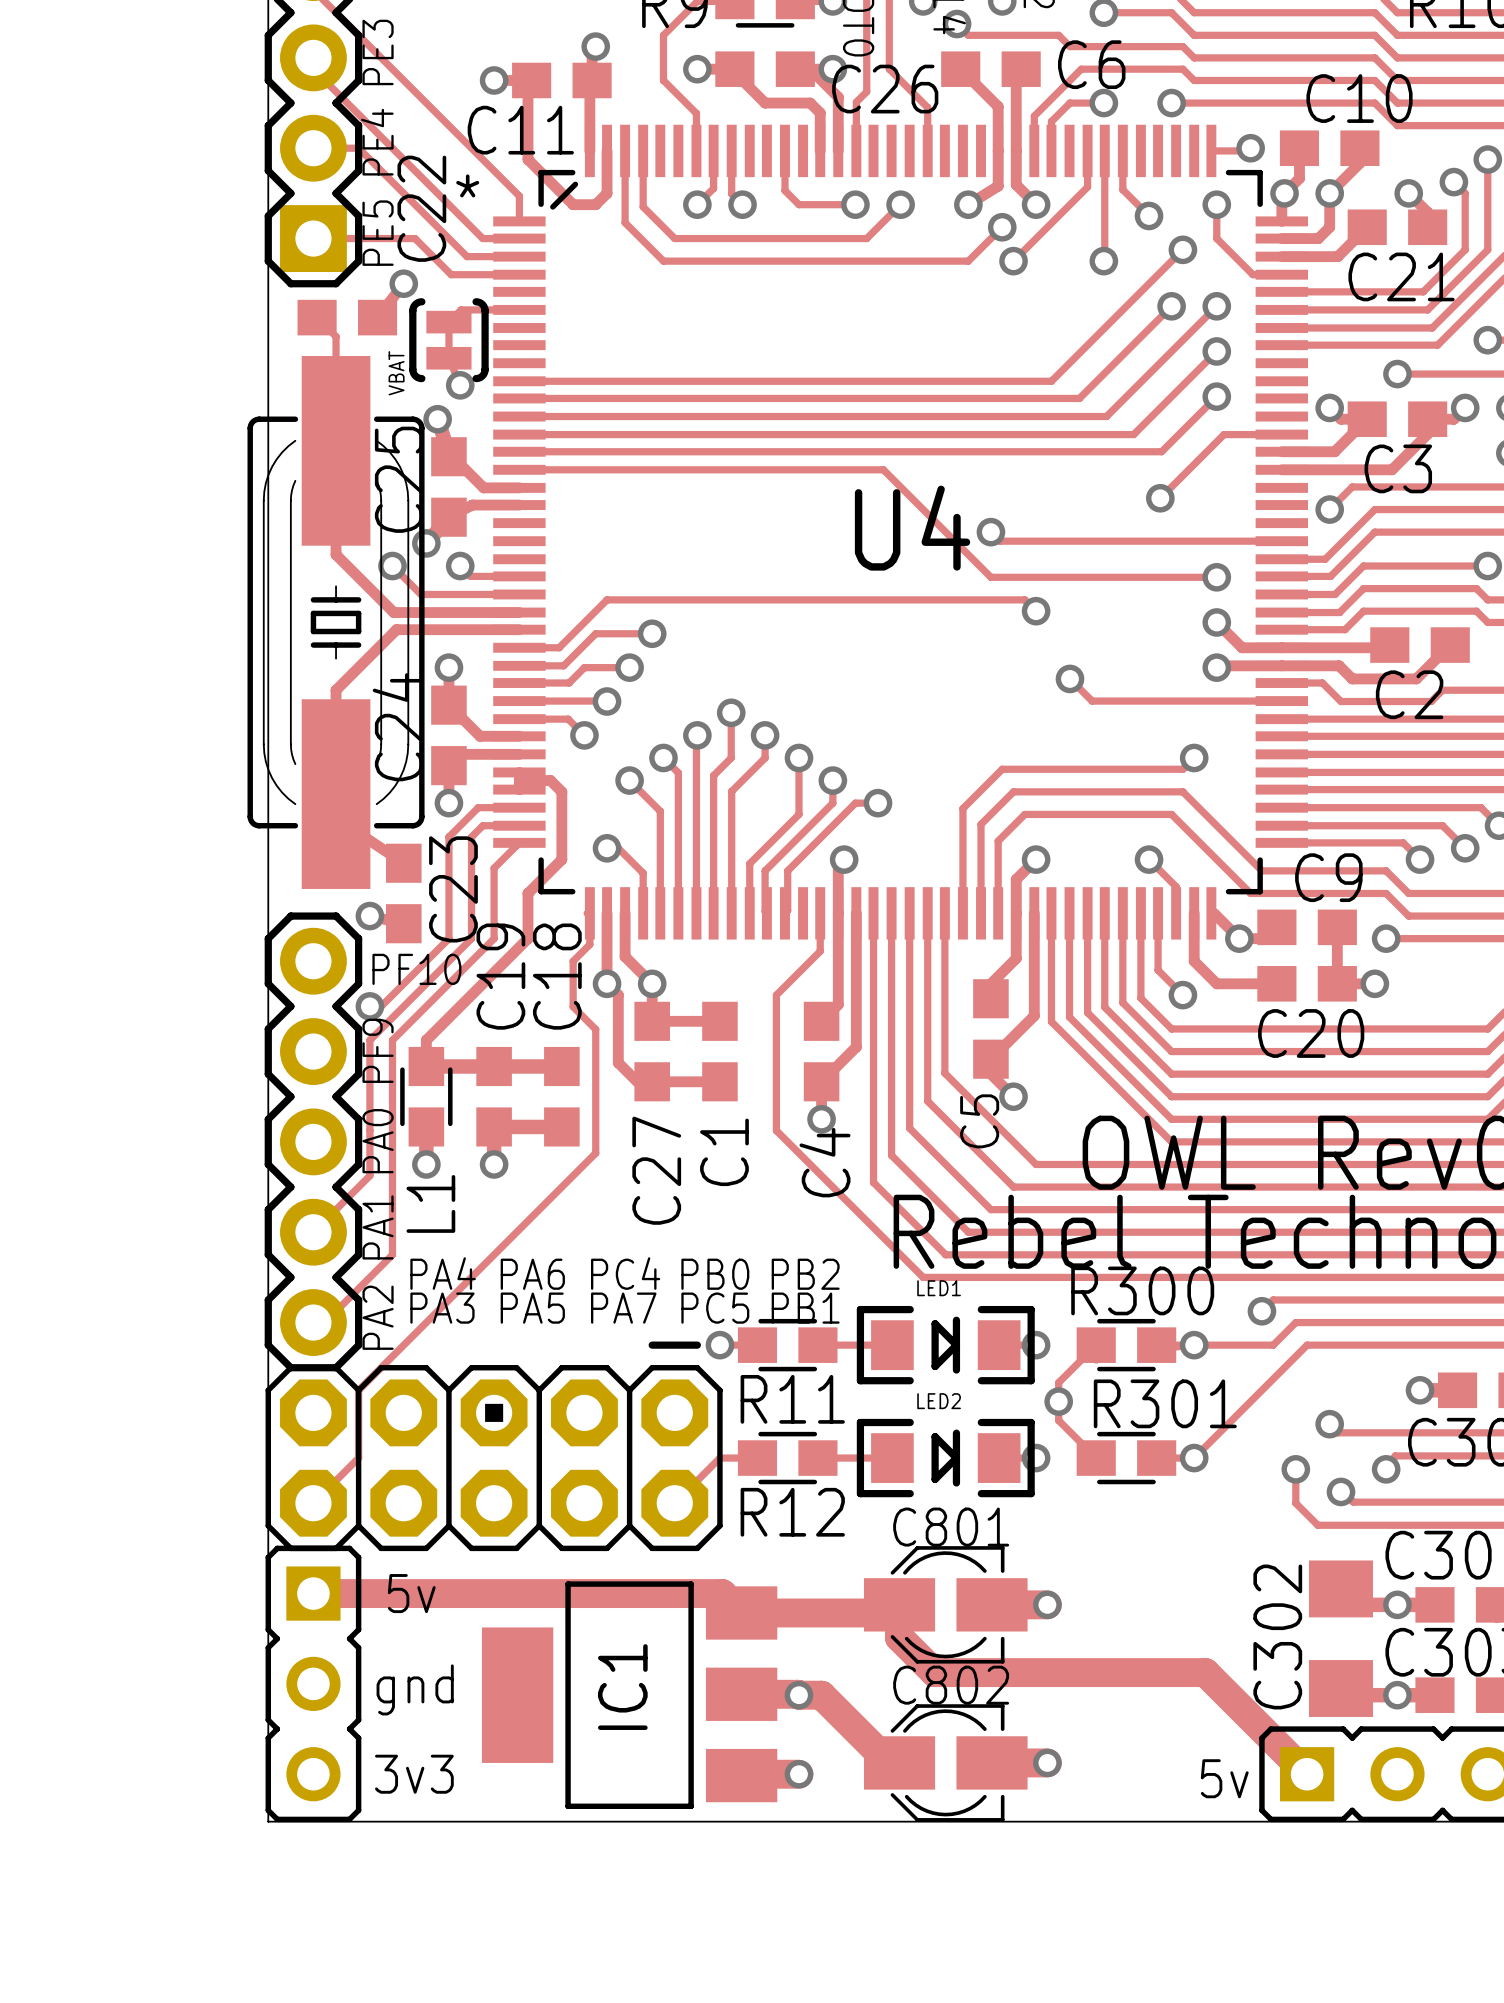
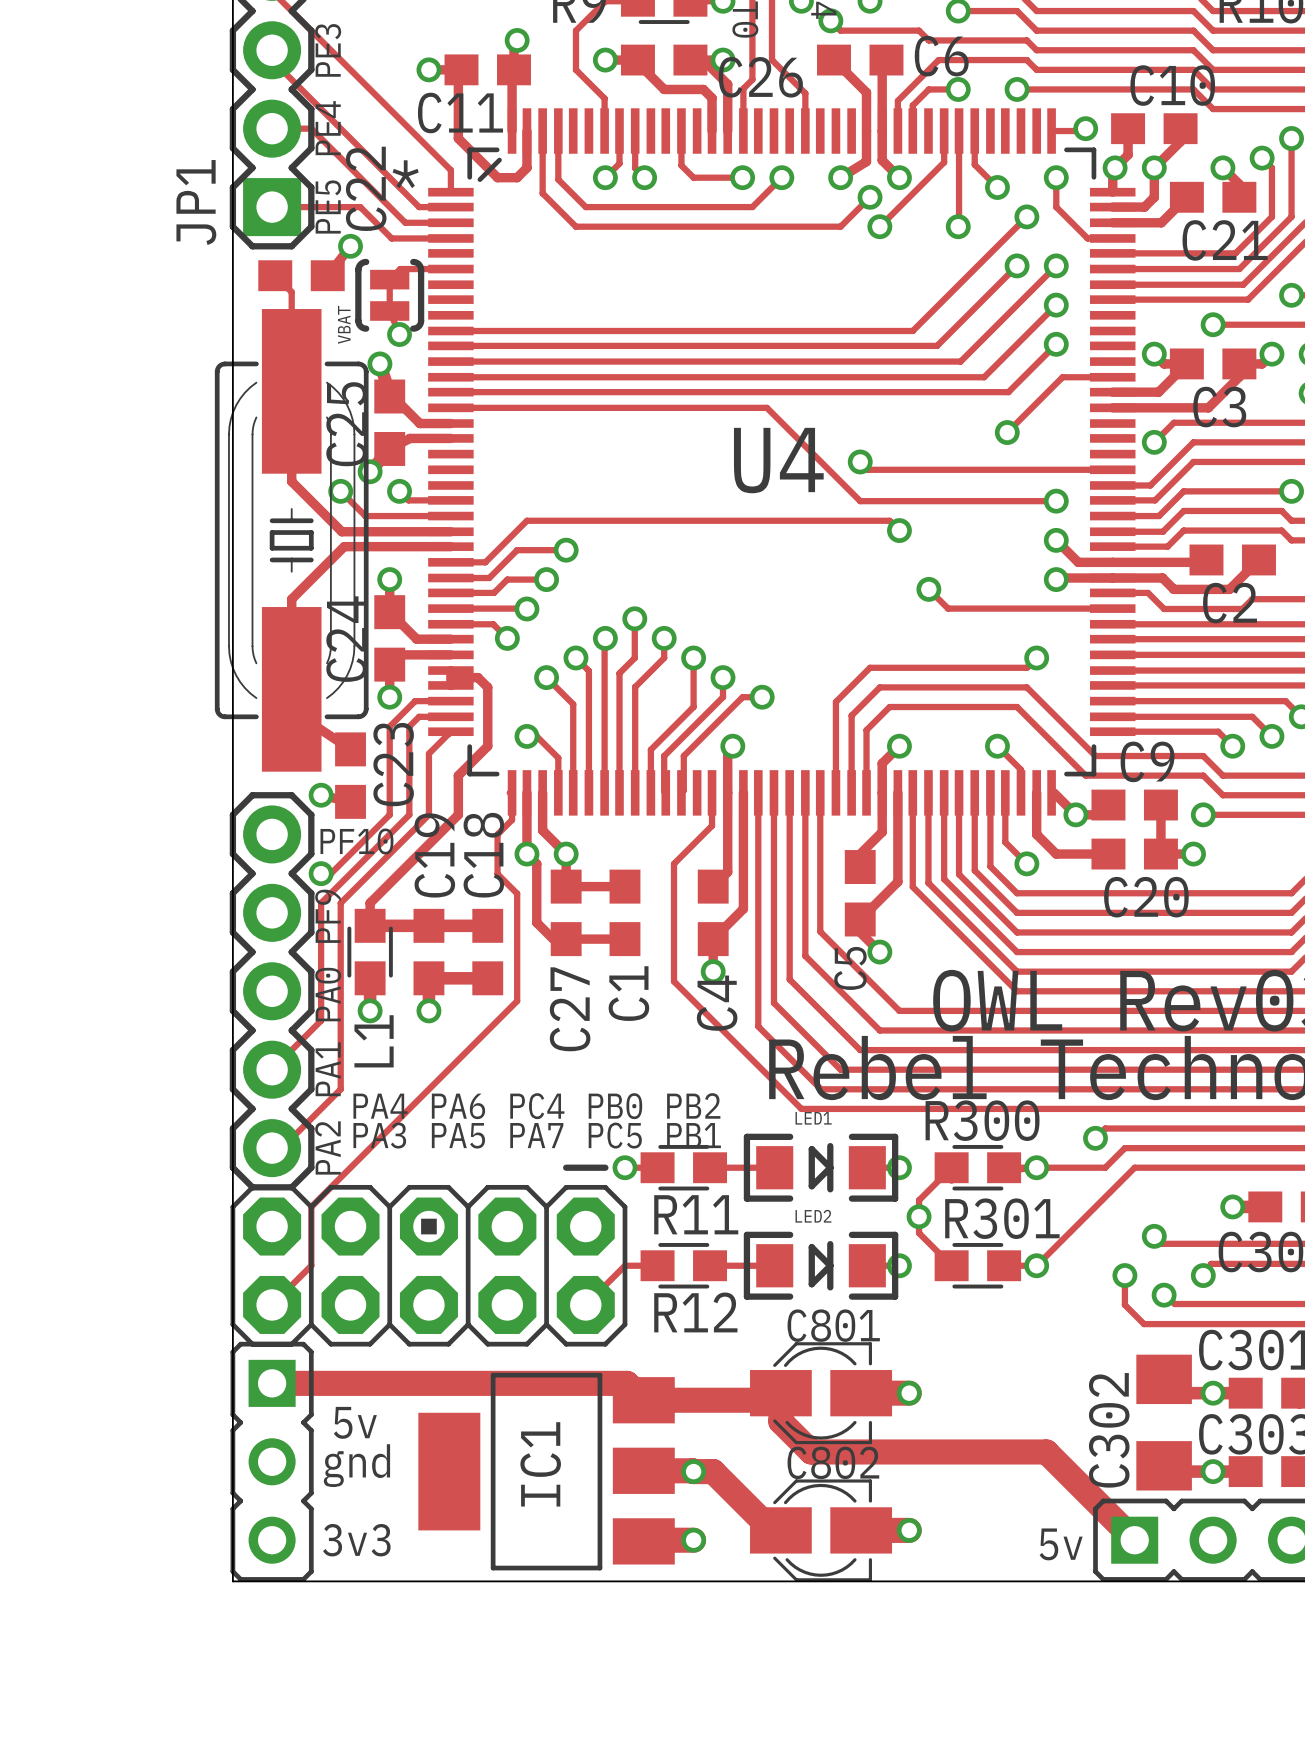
JP1 name: none -> JP1 (196, 202)
text position: 5v (411, 1593) -> 5v (355, 1422)

